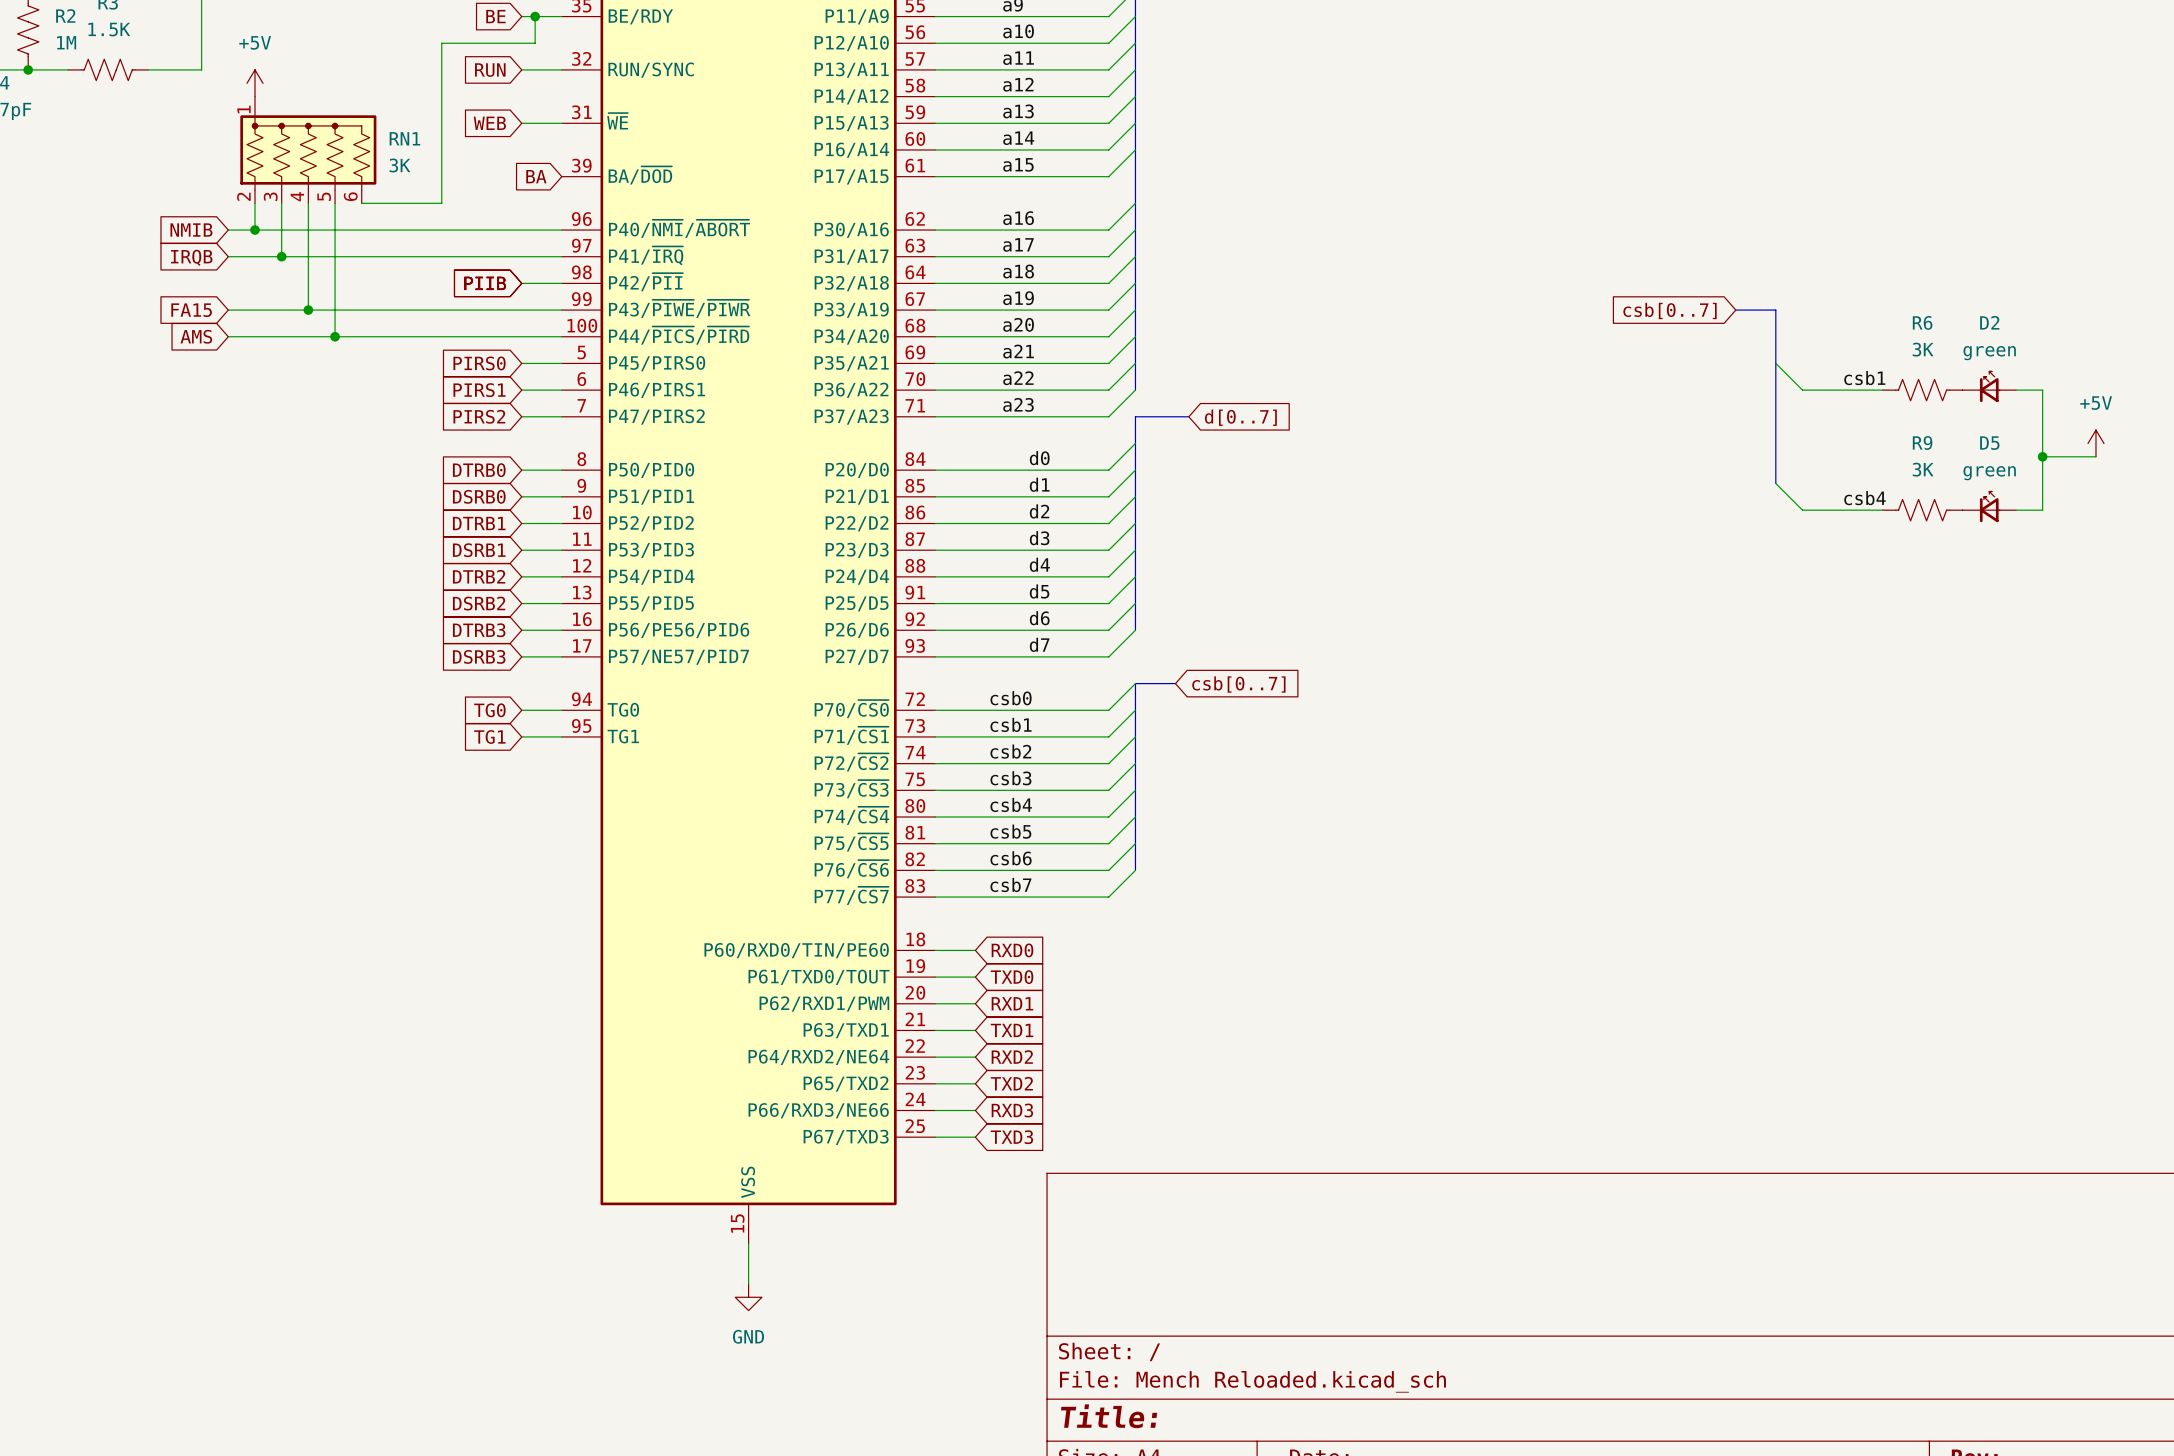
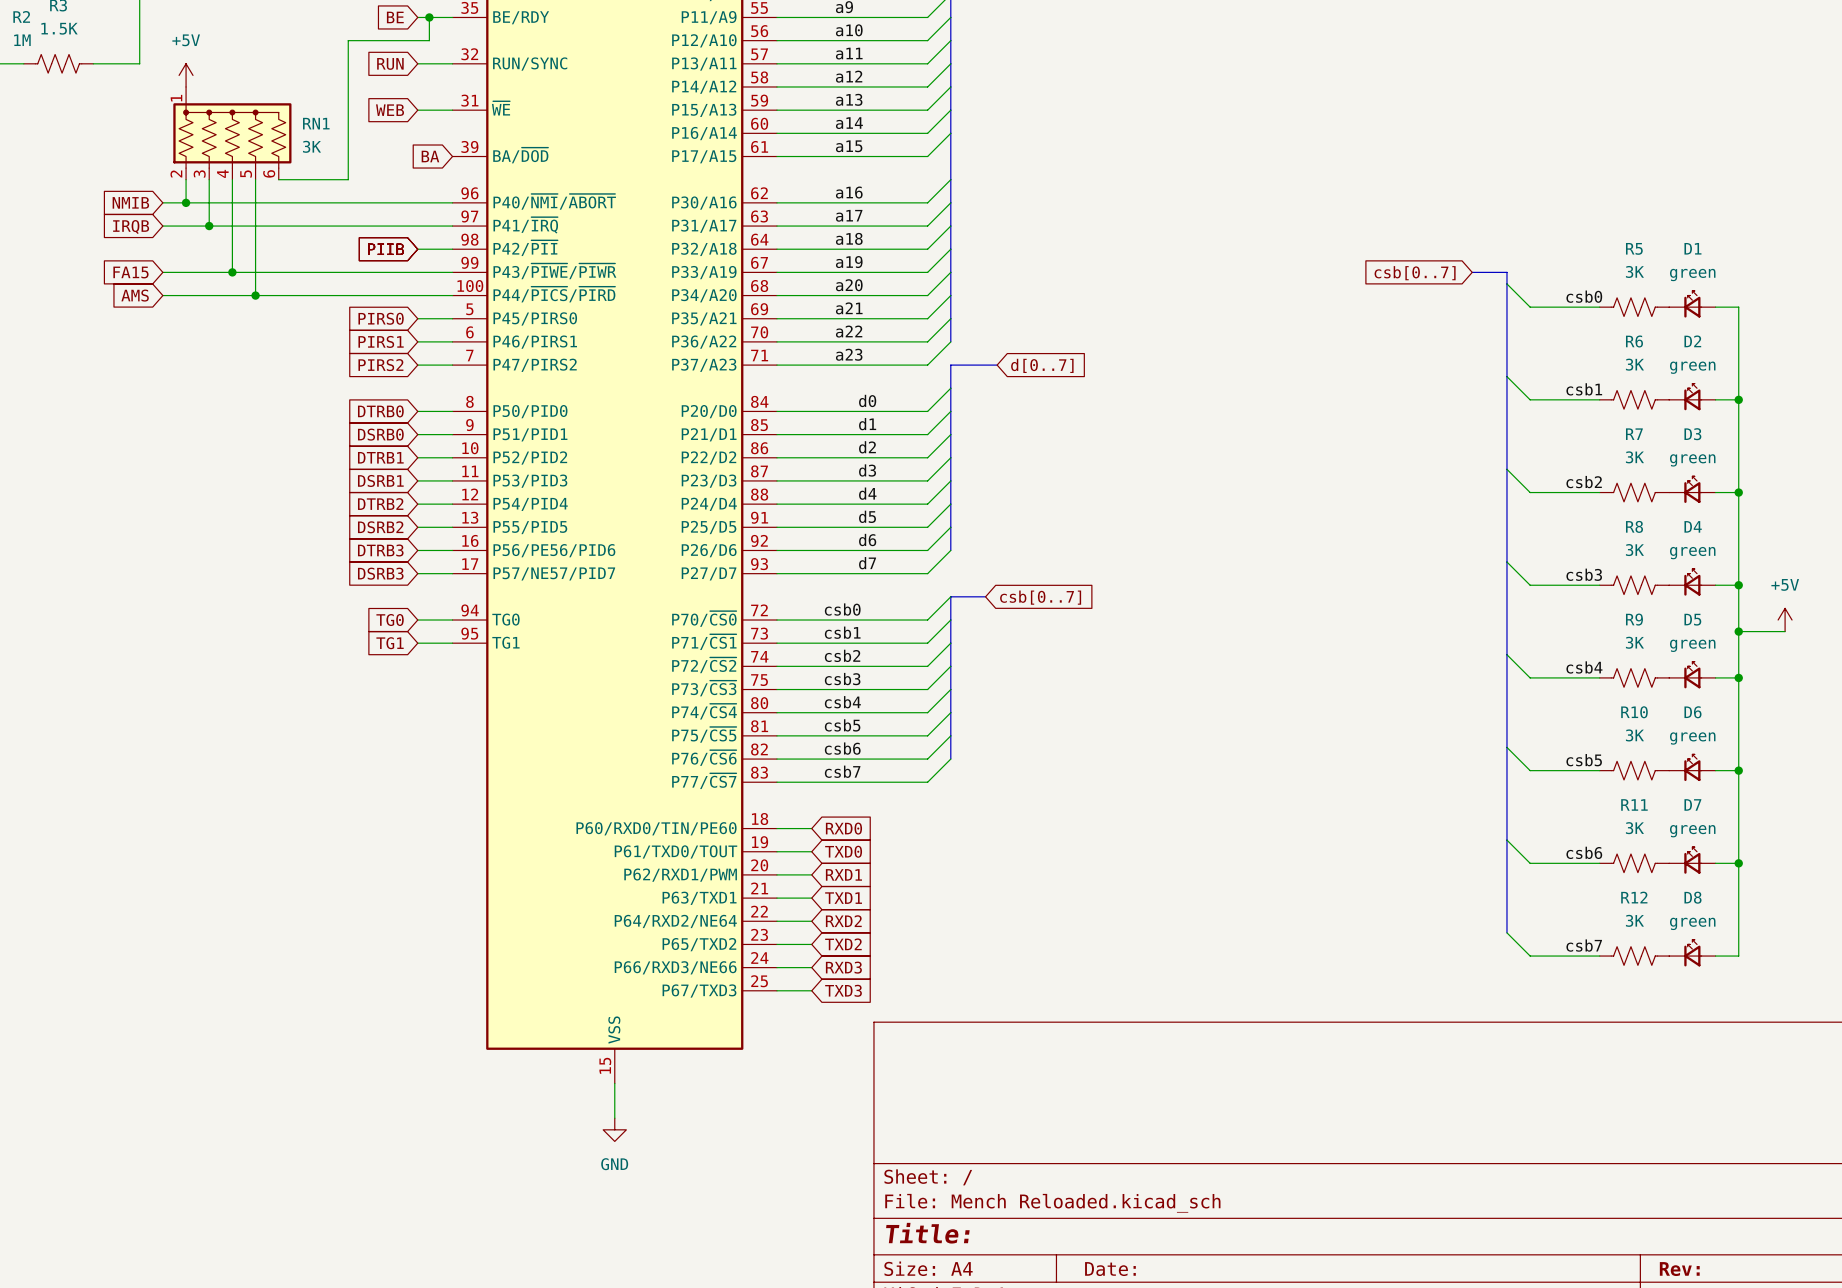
wire: none -> (1506, 283) (1530, 307) (1599, 307)
label: none -> csb0 (1584, 296)
D1: none -> green (1692, 304)
R5: none -> 3K (1634, 307)
wire: (1775, 363) (1802, 390) (1882, 390) -> (1506, 469) (1530, 492) (1599, 492)
label position: csb1 (1864, 378) -> csb1 (1584, 389)
D2 position: (1989, 386) -> (1692, 396)
R6 position: (1922, 390) -> (1634, 399)
wire: (2015, 390) (2042, 390) -> (1715, 307) (1738, 307) (1738, 341)
power symbol: +5V (2095, 443) -> none
wire: (2042, 456) (2095, 456) -> (1738, 399) (1715, 399)
wire: (1775, 483) (1802, 510) (1882, 510) -> (1506, 376) (1530, 399) (1599, 399)
bus: none -> (1506, 423) (1506, 932)
label: csb4 (1864, 498) -> none
D5 position: (1989, 506) -> (1692, 675)
R9 position: (1922, 510) -> (1634, 677)
wire: (2015, 510) (2042, 510) -> (1715, 956) (1738, 956) (1738, 446)
label: none -> csb2 (1584, 482)
D3: none -> green (1692, 489)
R7: none -> 3K (1634, 492)
wire: none -> (1715, 492) (1738, 492)
junction: none -> (1738, 492)
wire: none -> (1506, 562) (1530, 585) (1599, 585)
label: none -> csb3 (1584, 574)
D4: none -> green (1692, 582)
R8: none -> 3K (1634, 585)
wire: none -> (1715, 585) (1738, 585)
junction: none -> (1738, 585)
power symbol: none -> +5V (1785, 620)
wire: none -> (1738, 631) (1785, 631)
junction: none -> (1738, 631)
wire: none -> (1506, 654) (1530, 677) (1599, 677)
label: none -> csb4 (1584, 667)
wire: none -> (1715, 677) (1738, 677)
junction: none -> (1738, 677)
wire: none -> (1506, 747) (1530, 770) (1599, 770)
label: none -> csb5 (1584, 760)
D6: none -> green (1692, 767)
R10: none -> 3K (1634, 770)
wire: none -> (1715, 770) (1738, 770)
junction: none -> (1738, 770)
wire: none -> (1506, 840) (1530, 863) (1599, 863)
label: none -> csb6 (1584, 852)
D7: none -> green (1692, 860)
R11: none -> 3K (1634, 863)
wire: none -> (1715, 863) (1738, 863)
junction: none -> (1738, 863)
wire: none -> (1506, 932) (1530, 956) (1599, 956)
label: none -> csb7 (1584, 945)
D8: none -> green (1692, 953)
R12: none -> 3K (1634, 956)

